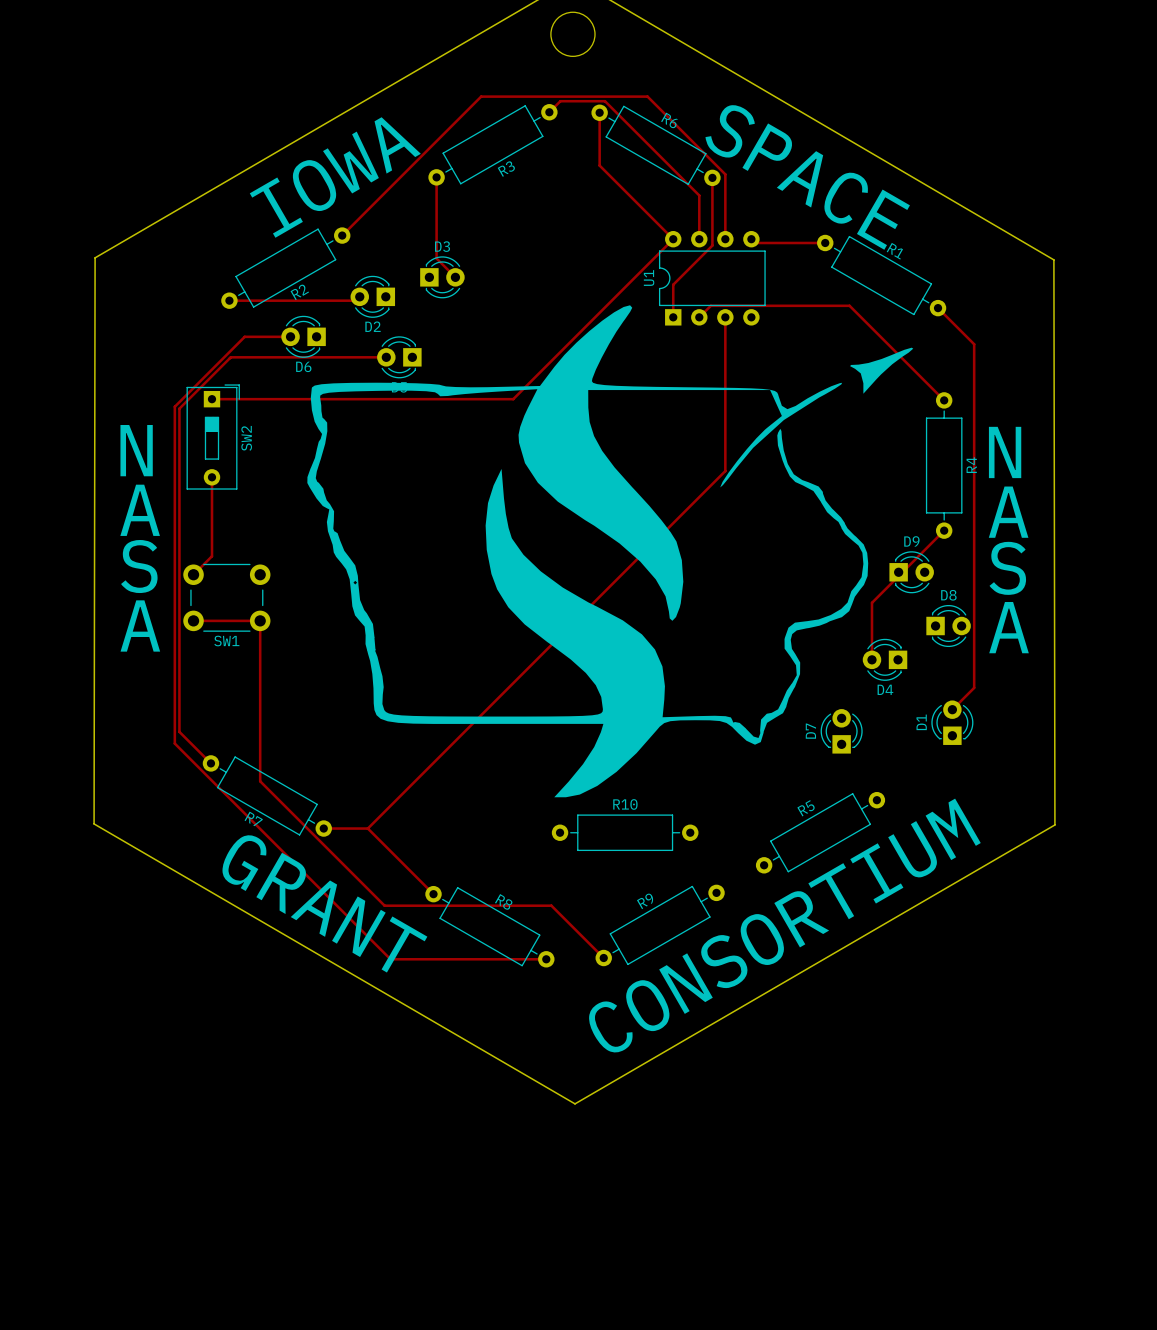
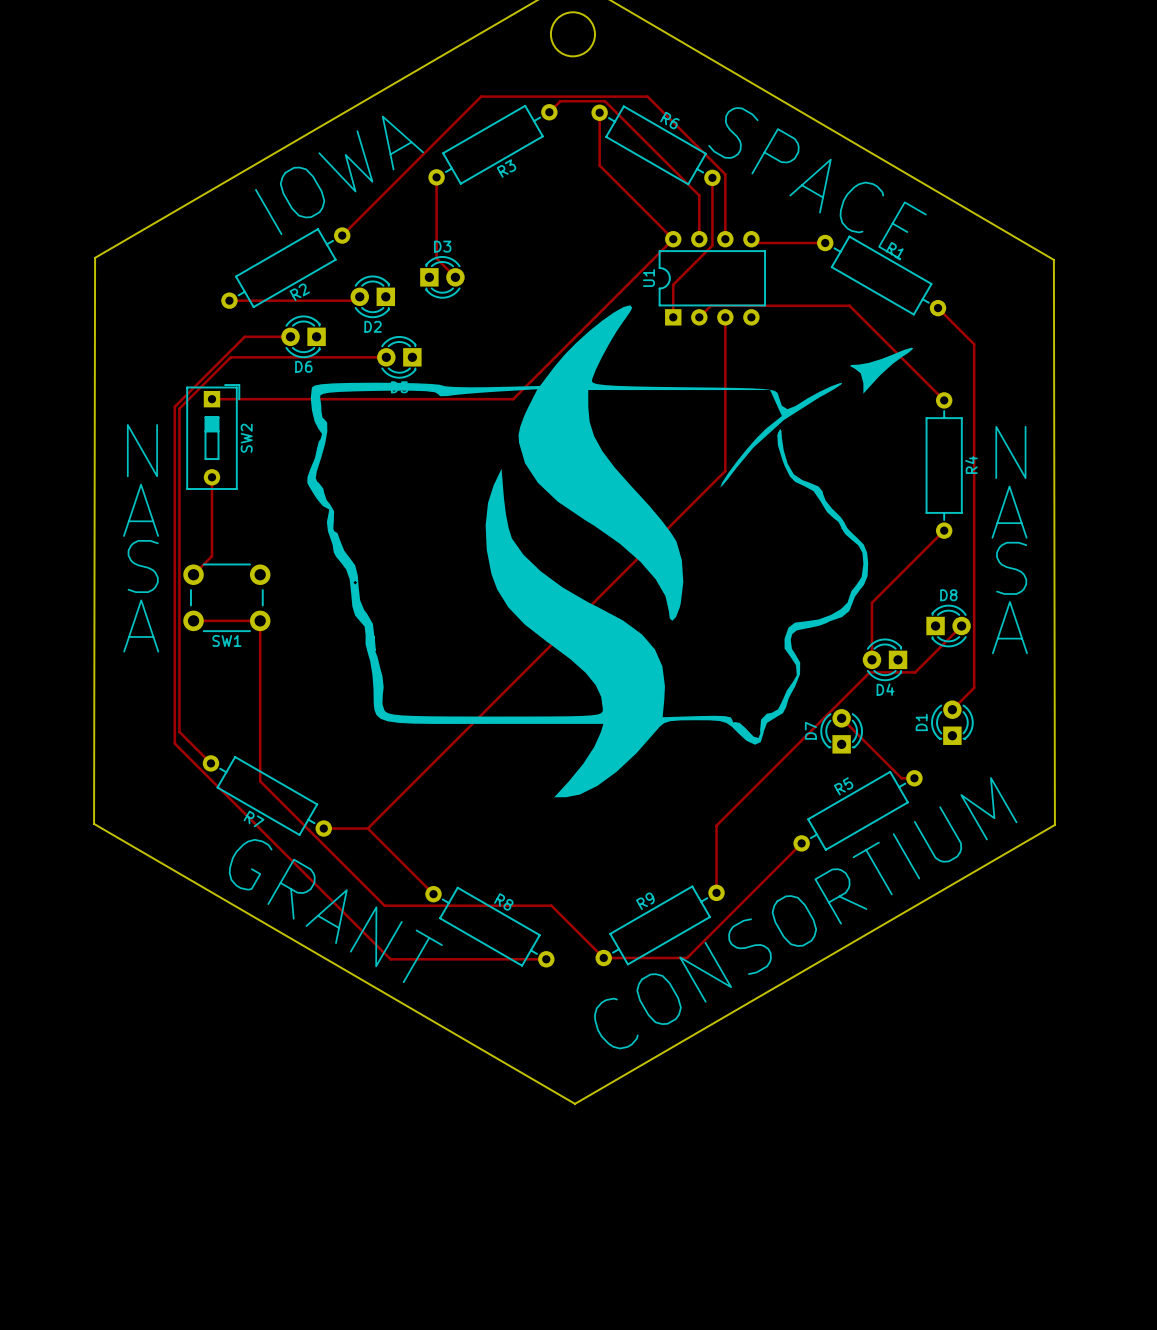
D9: (911, 572) -> none
track: none -> (961, 626) (915, 672) (869, 672) (716, 825) (716, 892)
track: none -> (841, 718) (901, 778) (914, 778)
R10: (625, 832) -> none
R5 position: (820, 832) -> (858, 810)
track: none -> (801, 843) (687, 958) (603, 958)

